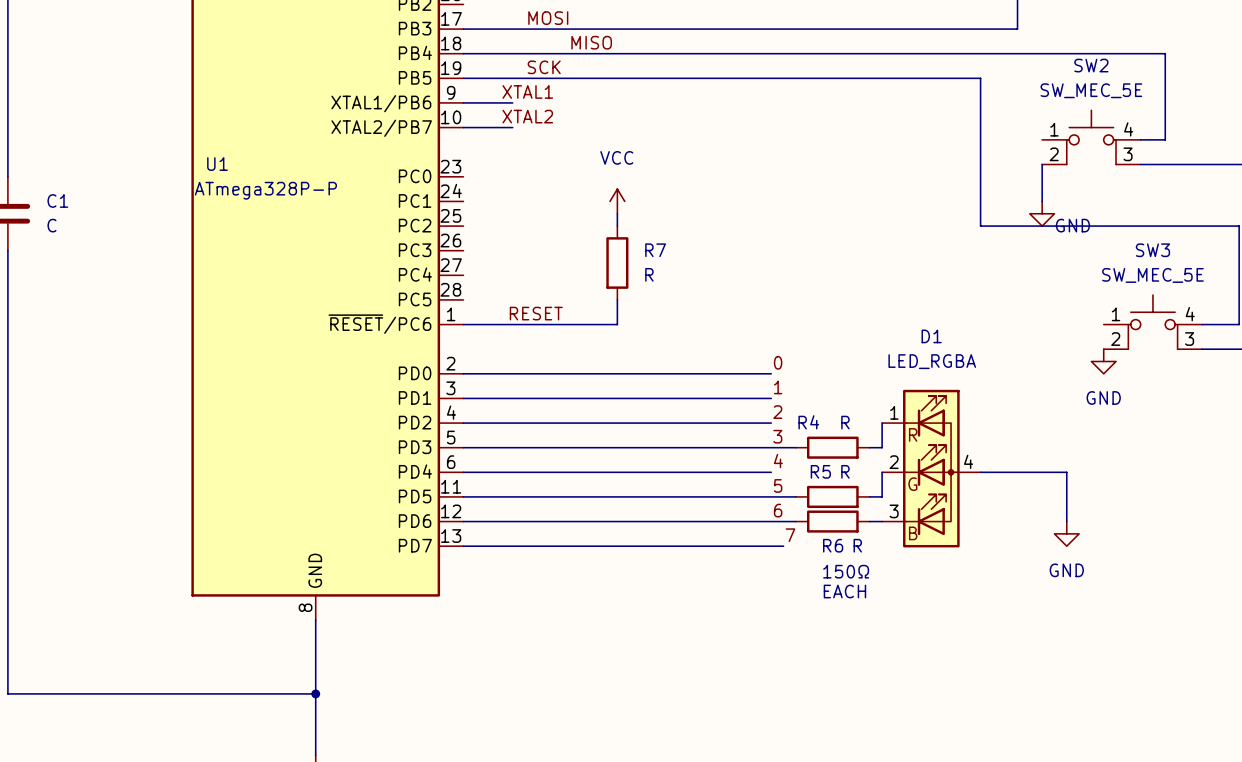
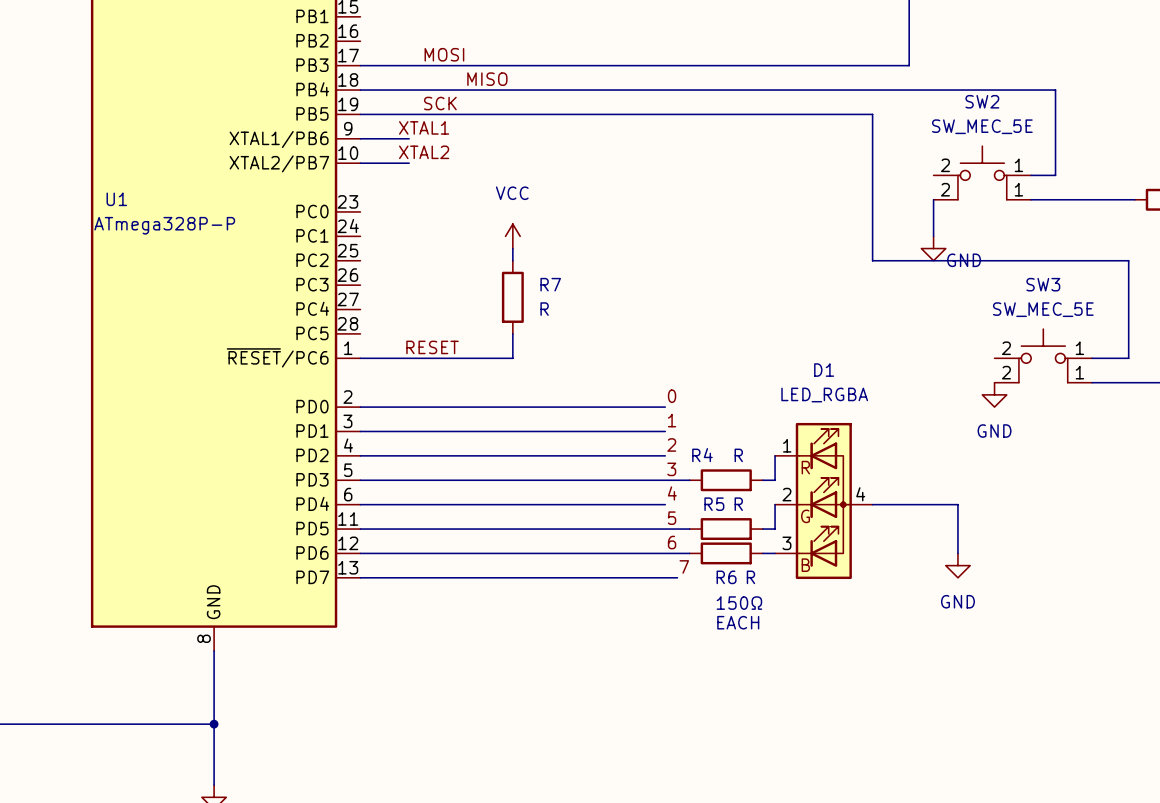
SW2 pin number: 1 (1054, 129) -> 2 (945, 165)
SW2 pin number: 4 (1128, 129) -> 1 (1018, 165)
SW2 pin number: 3 (1128, 154) -> 1 (1018, 189)
SW3 pin number: 1 (1116, 314) -> 2 (1006, 348)
SW3 pin number: 4 (1190, 314) -> 1 (1079, 348)
SW3 pin number: 3 (1189, 339) -> 1 (1079, 372)

